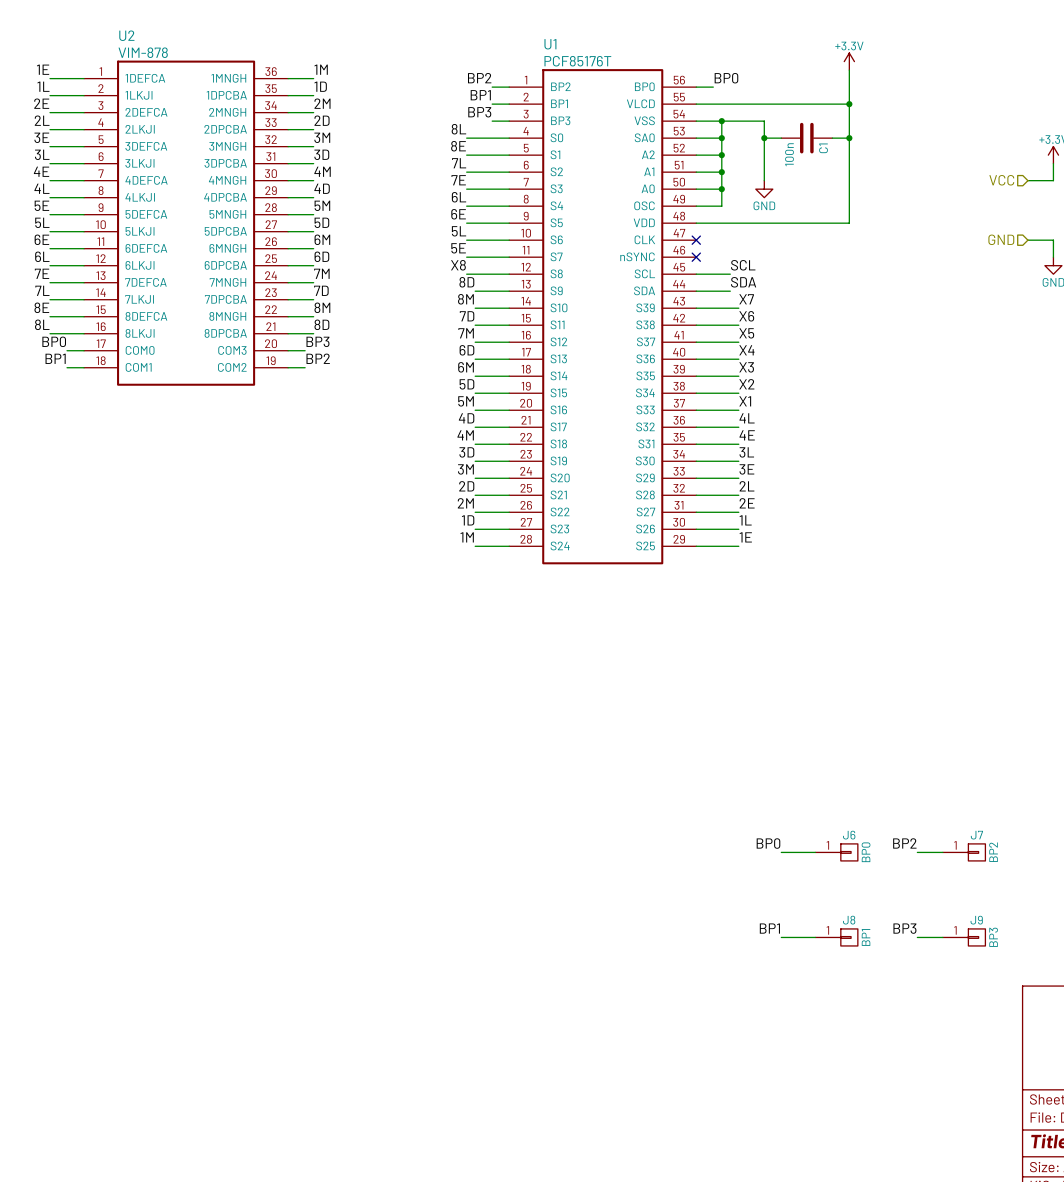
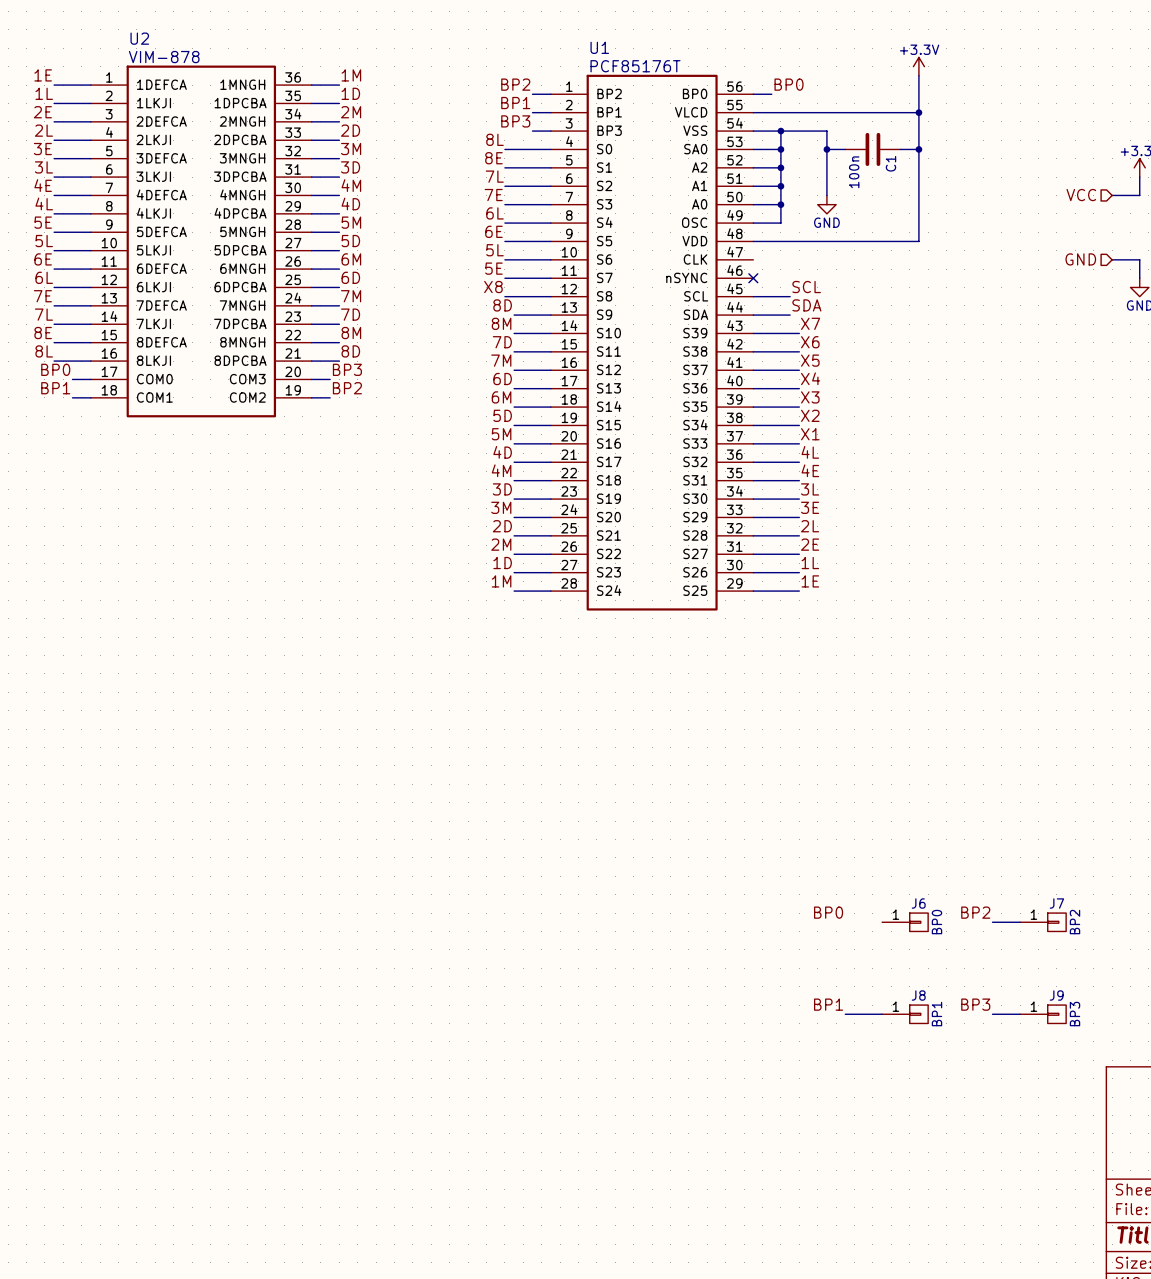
no-connect mark: (696, 240) -> none
wire: (781, 852) (815, 852) -> none

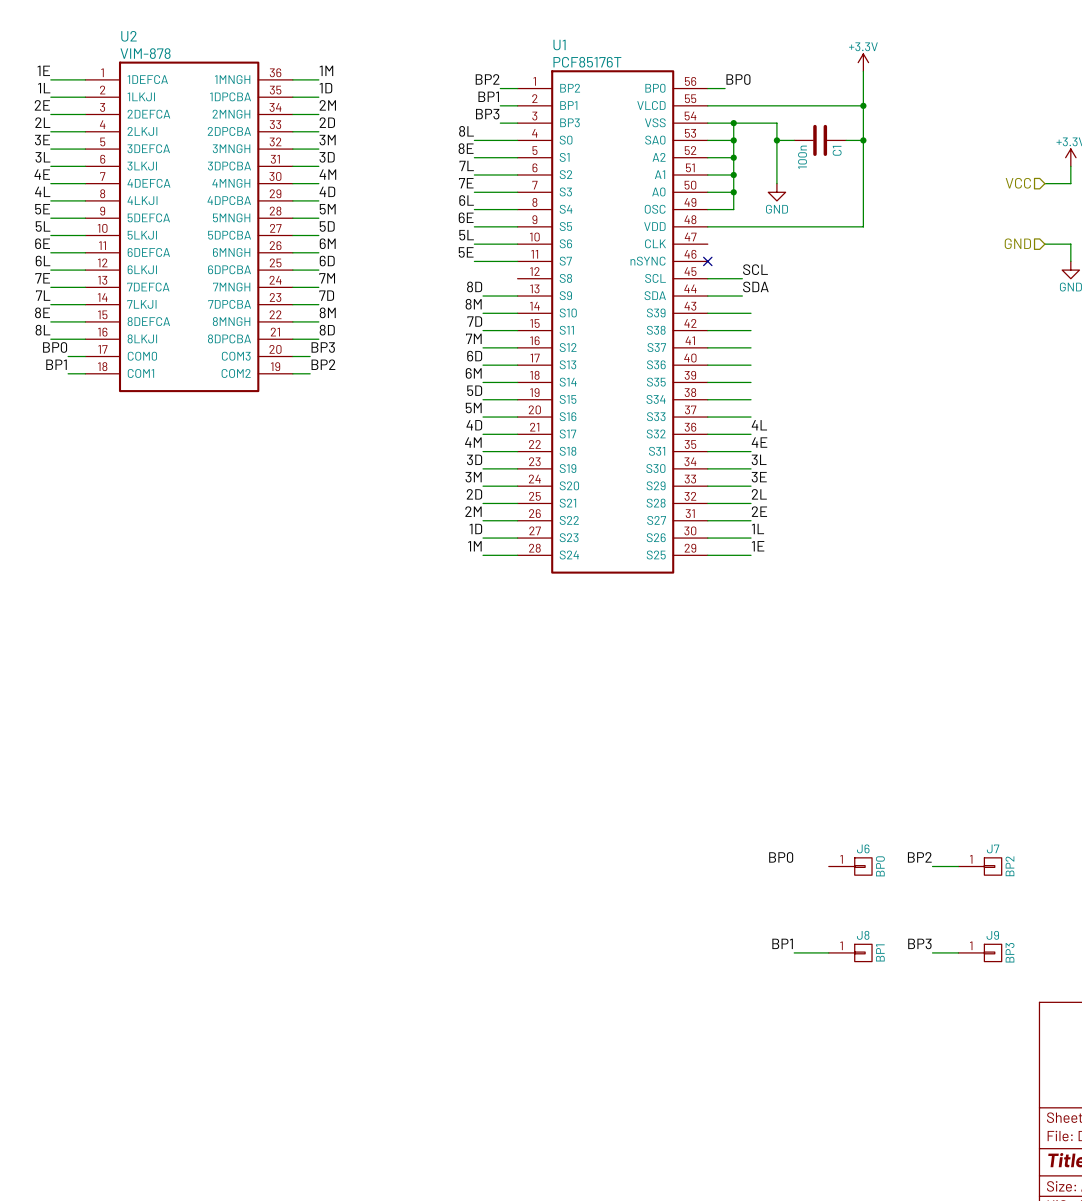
label: X8 (493, 287) -> none
wire: (504, 296) (550, 296) -> none
label: X7 (810, 323) -> none
label: X6 (810, 342) -> none
label: X5 (810, 360) -> none
label: X4 (810, 378) -> none
label: X3 (810, 397) -> none
label: X2 (810, 415) -> none
label: X1 (810, 434) -> none

